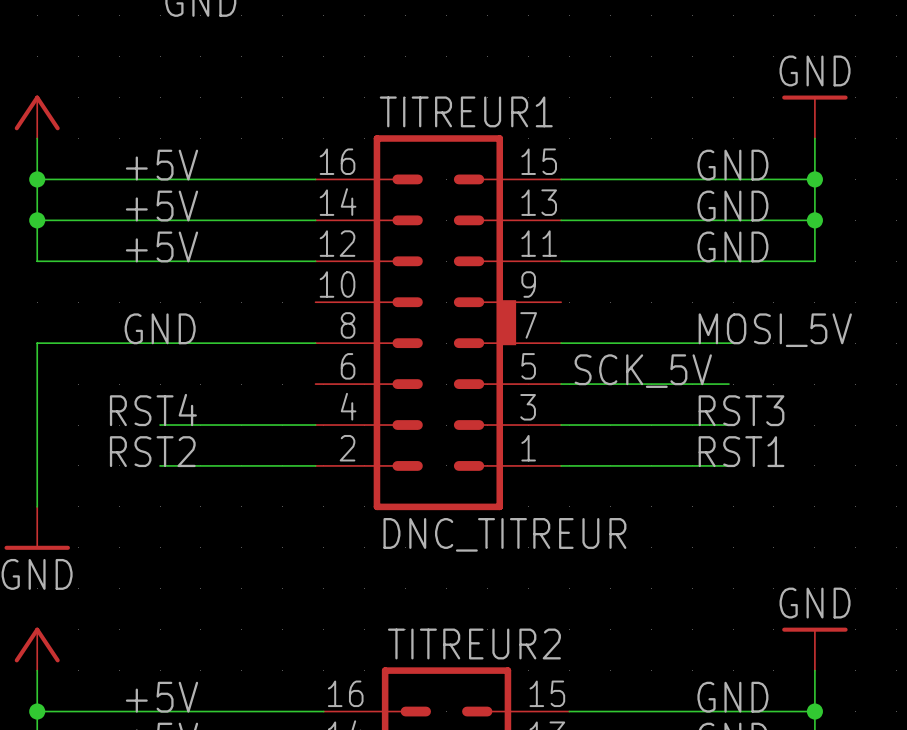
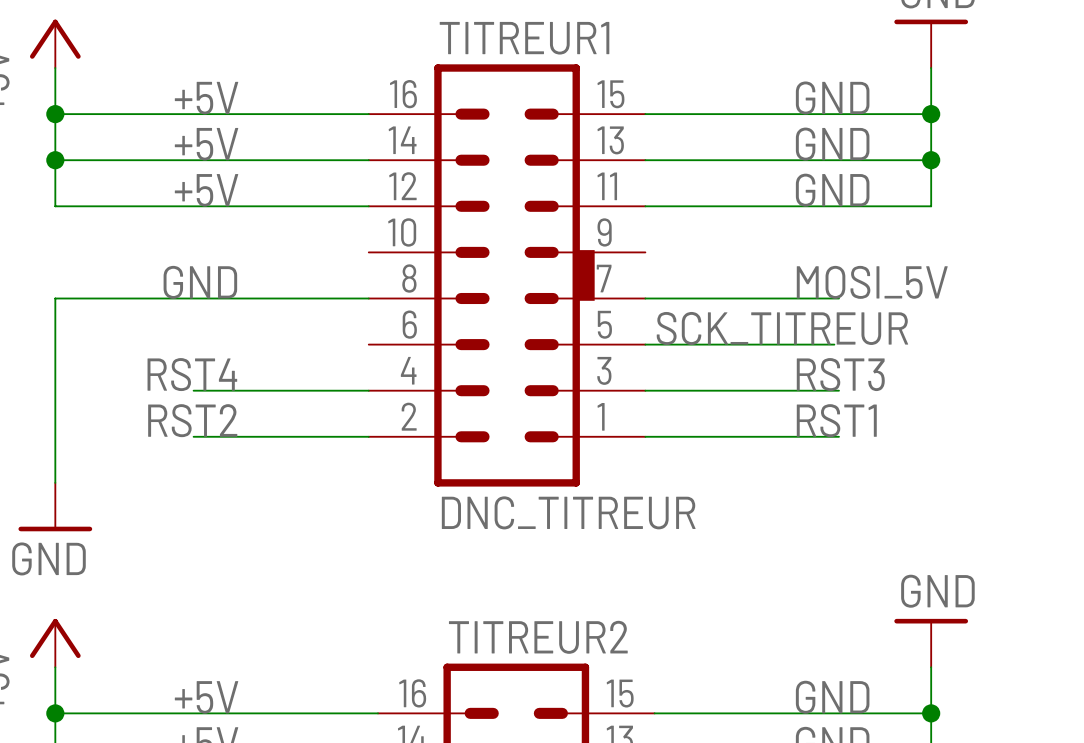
label: SCK_5V (643, 371) -> SCK_TITREUR (782, 328)

